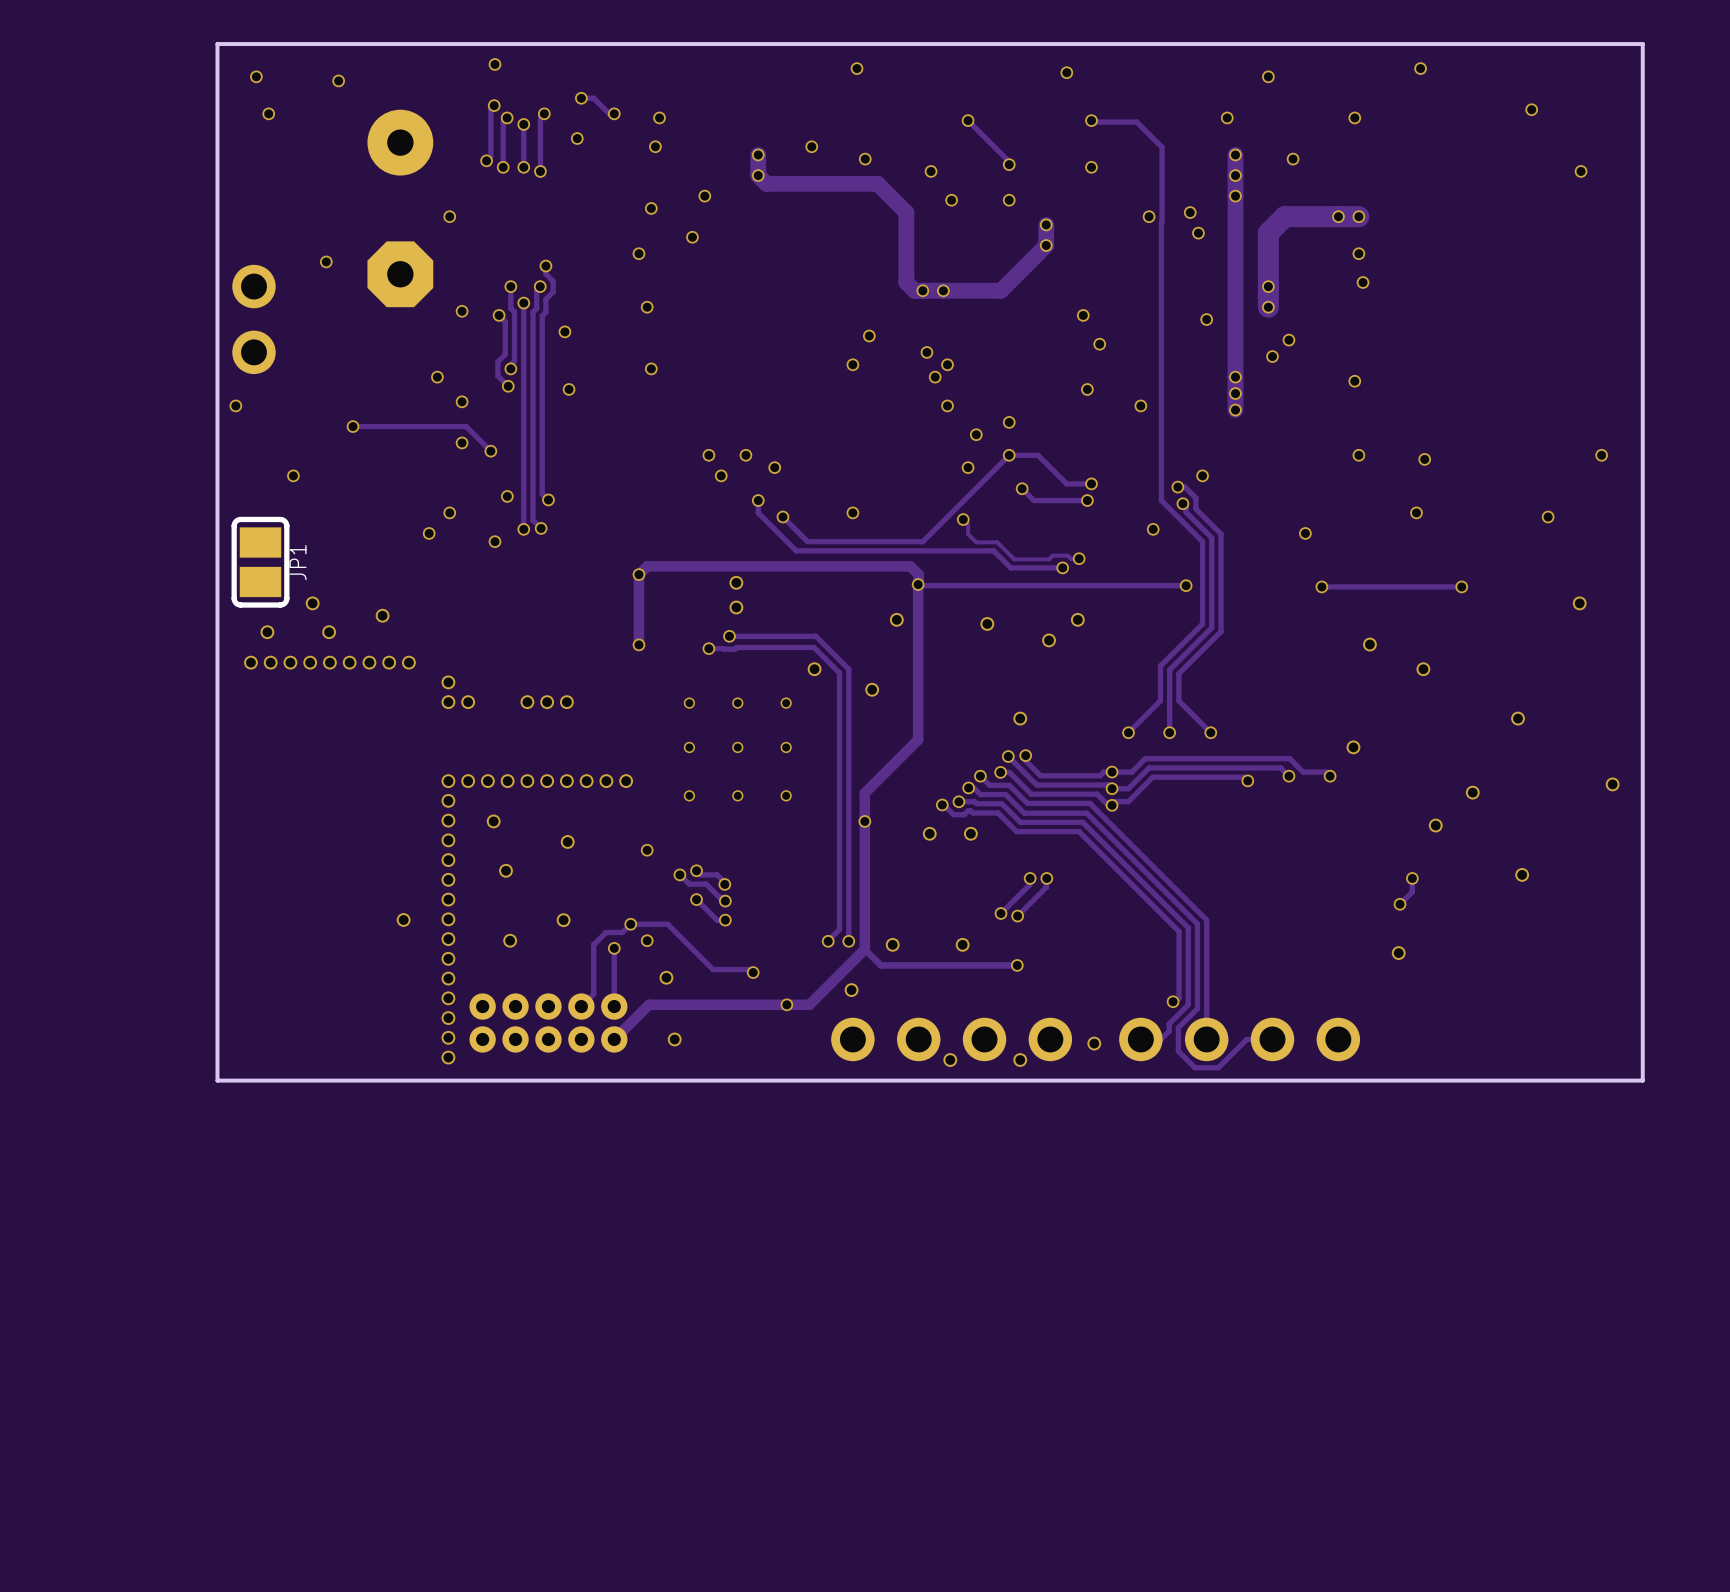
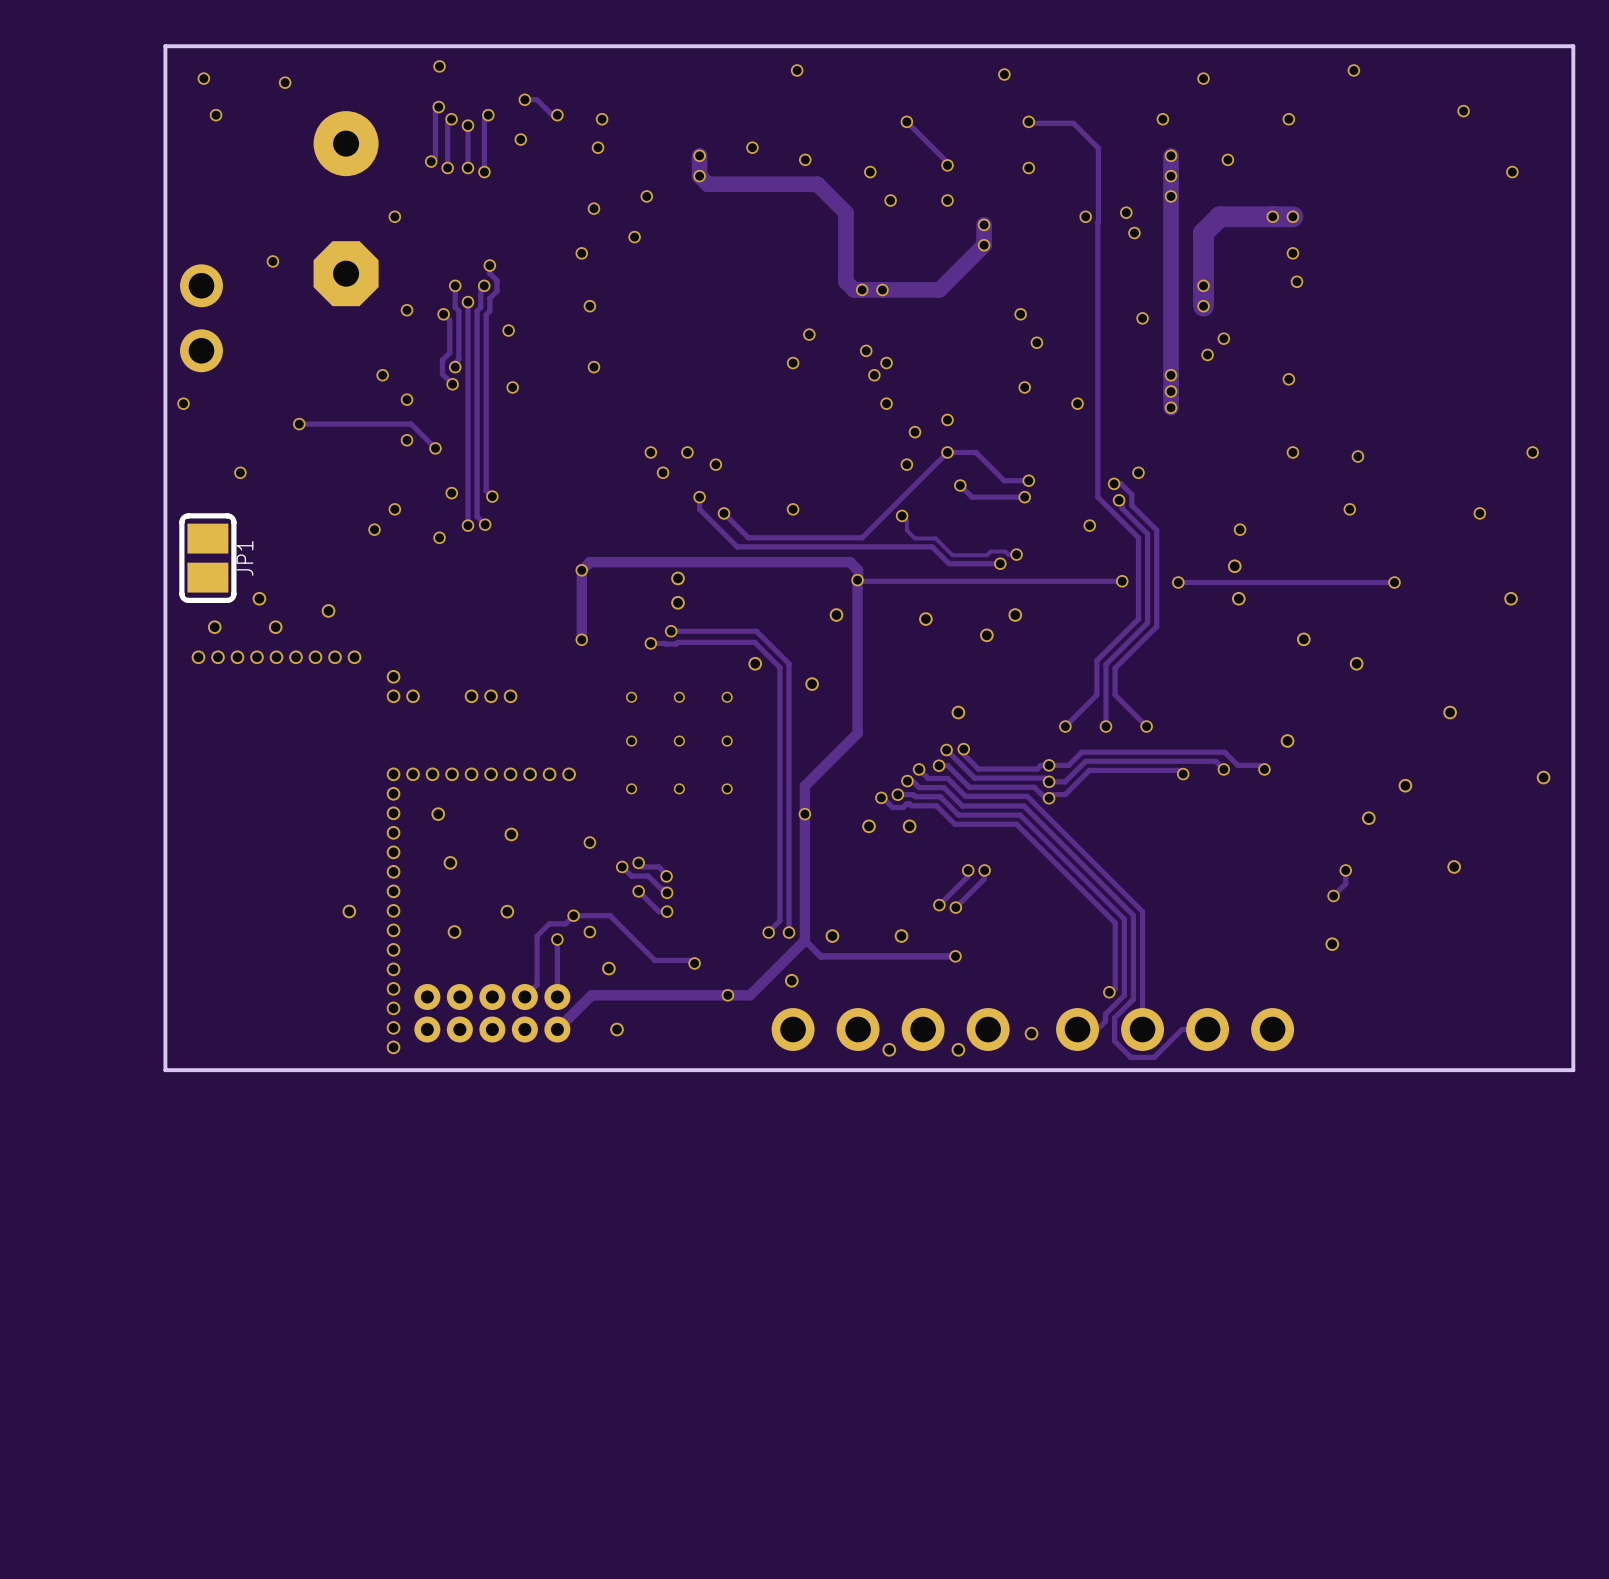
via: none -> (1234, 566)
track: none -> (1256, 582) (1178, 582)
via position: (1321, 586) -> (1178, 582)
via: none -> (1238, 598)

